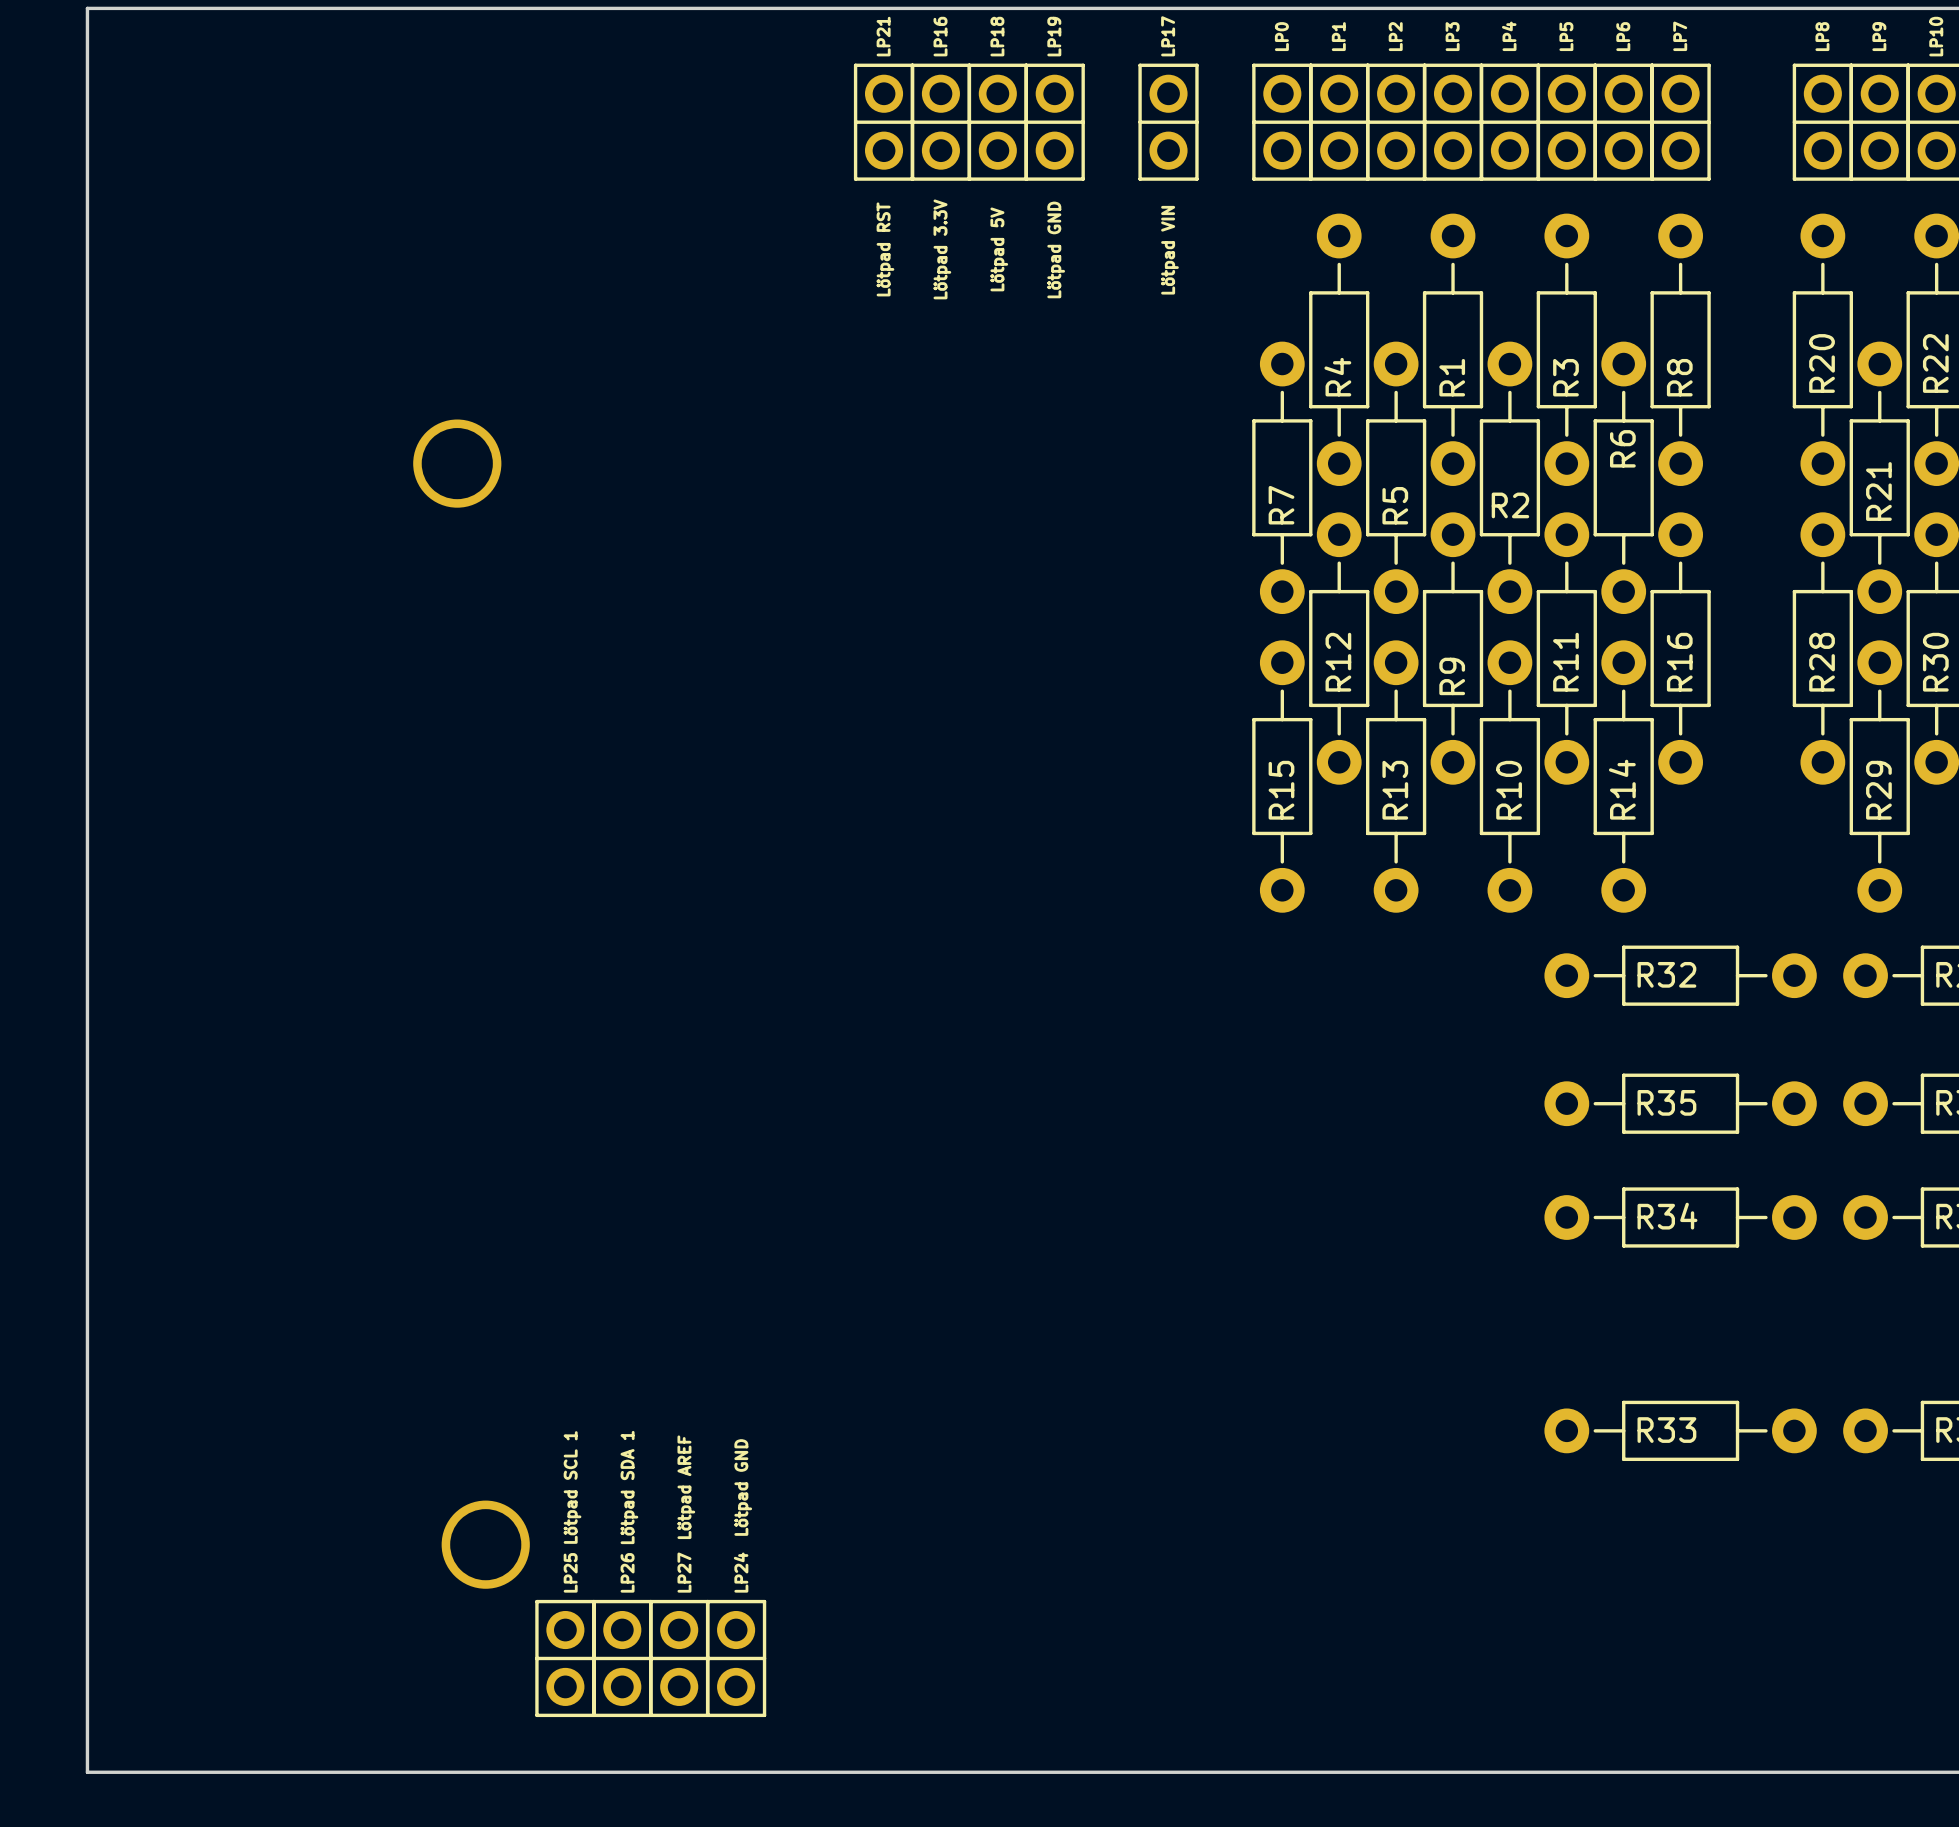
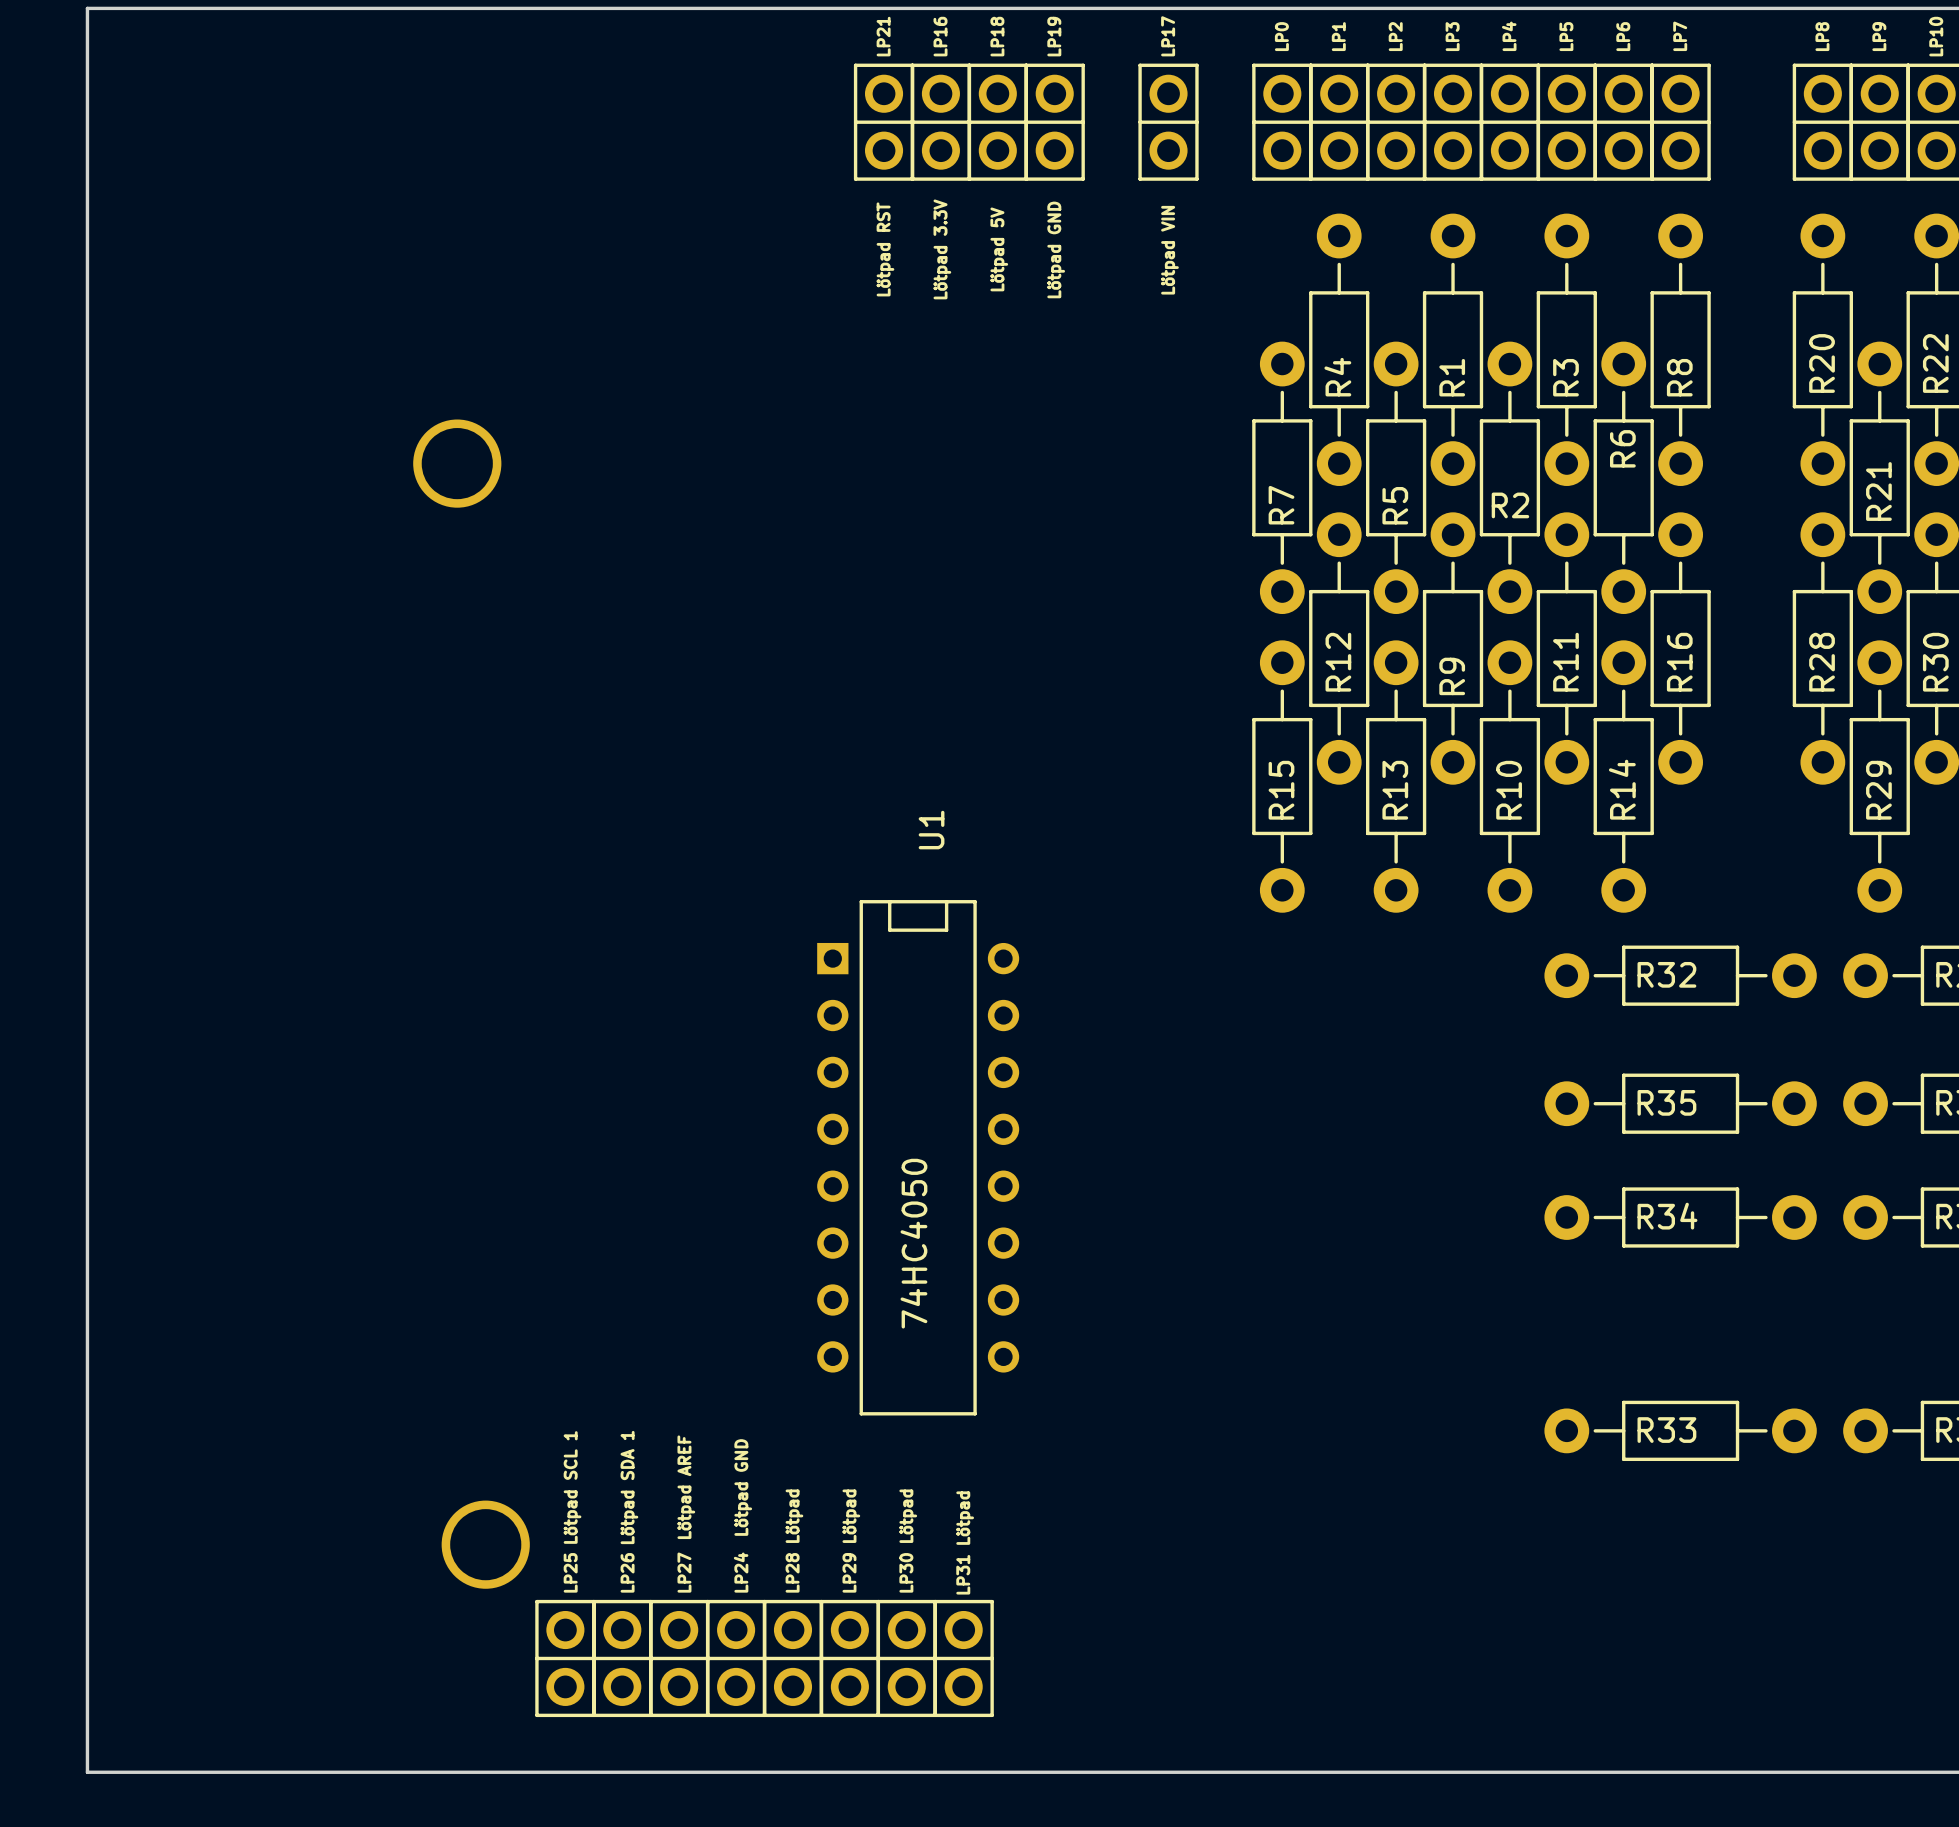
U1: none -> 74HC4050 (918, 1157)
LP28: none -> Lötpad (792, 1658)
LP29: none -> Lötpad (849, 1658)
LP30: none -> Lötpad (906, 1658)
LP31: none -> Lötpad (963, 1658)

